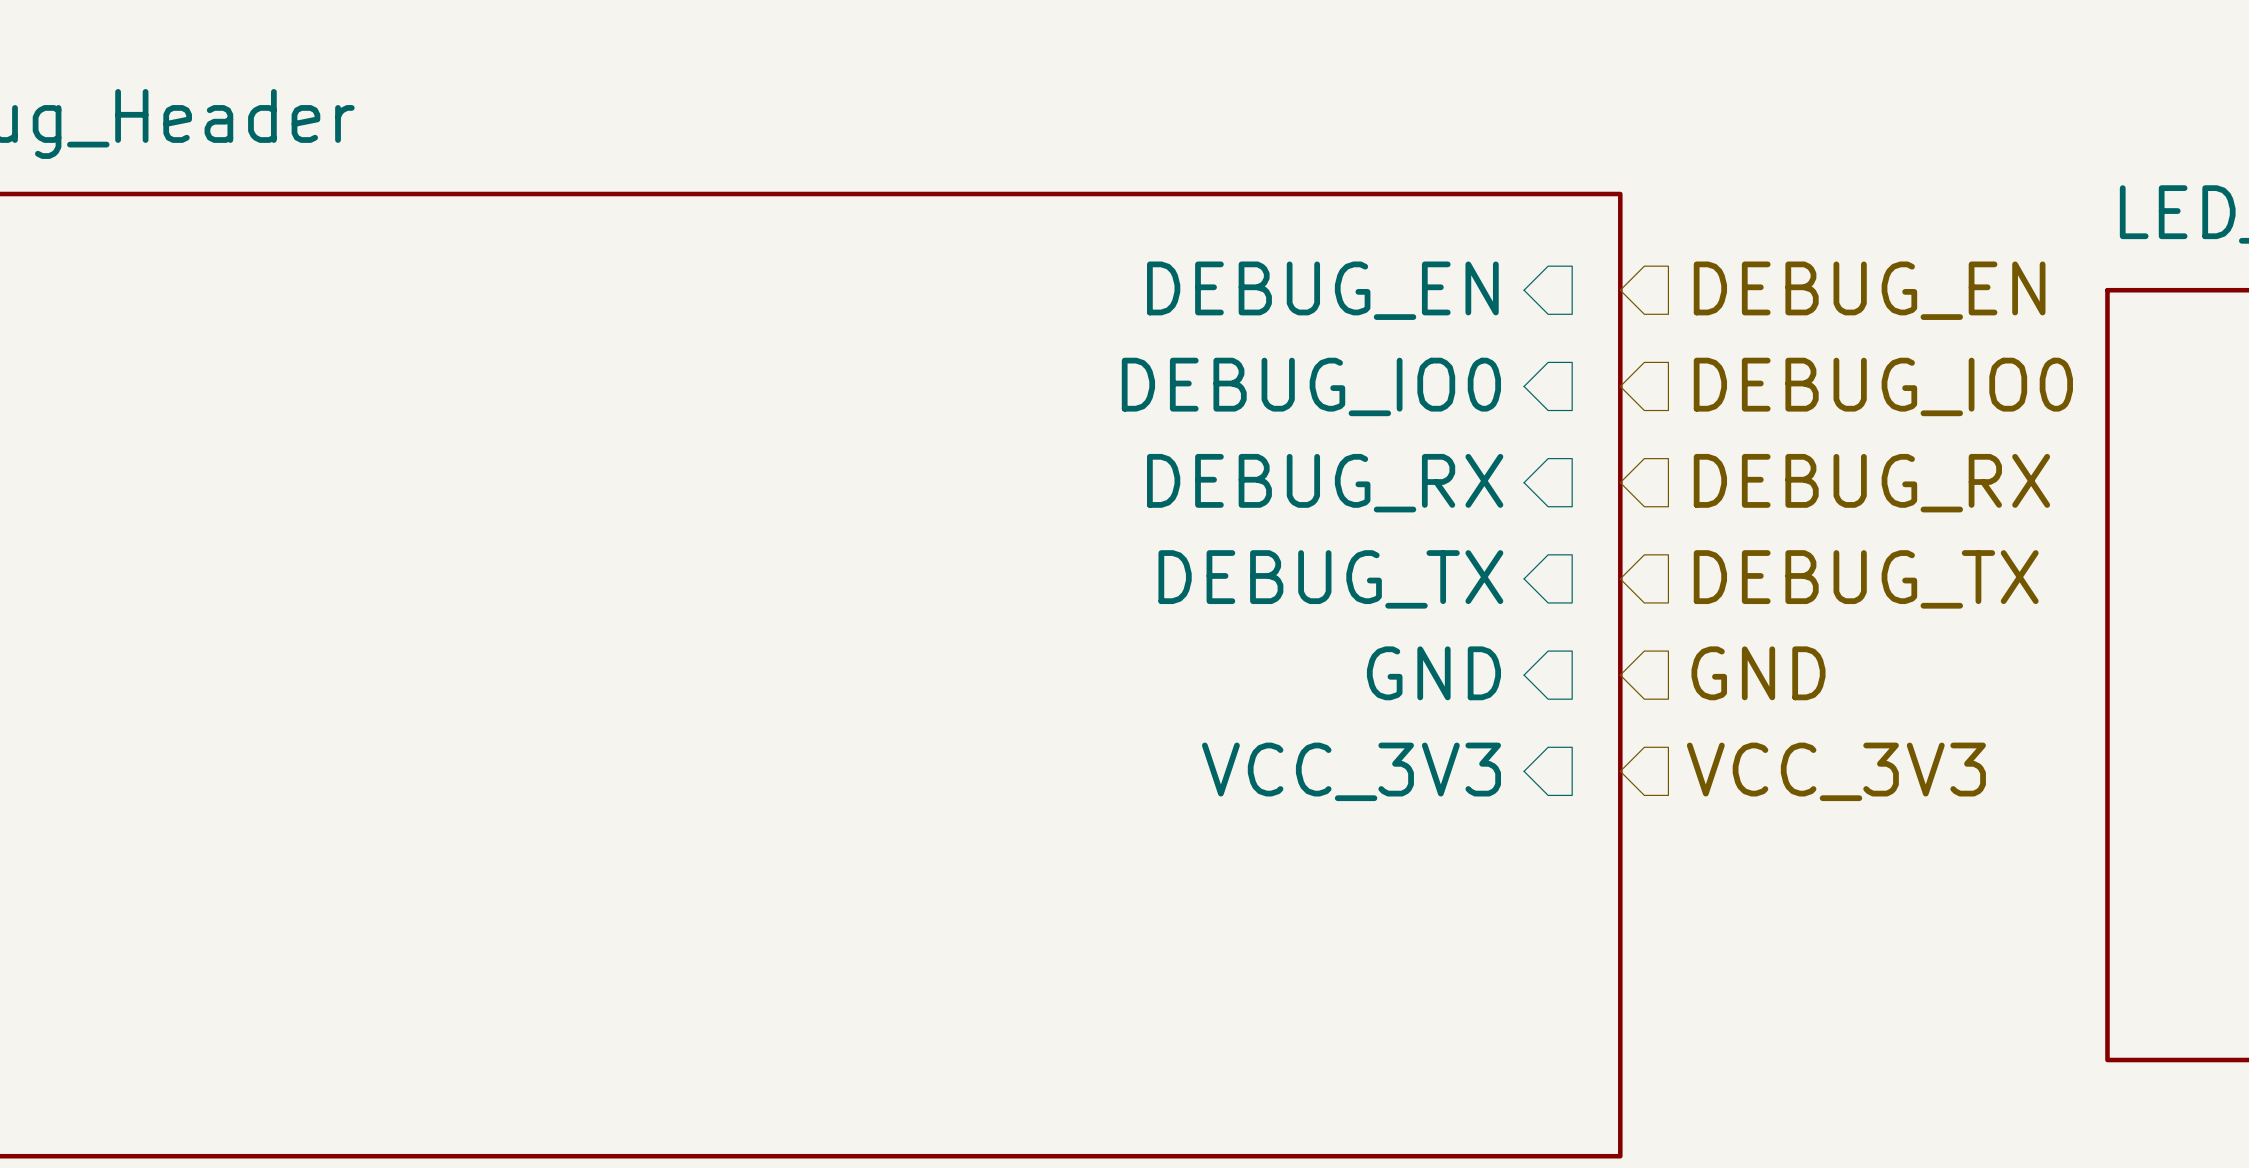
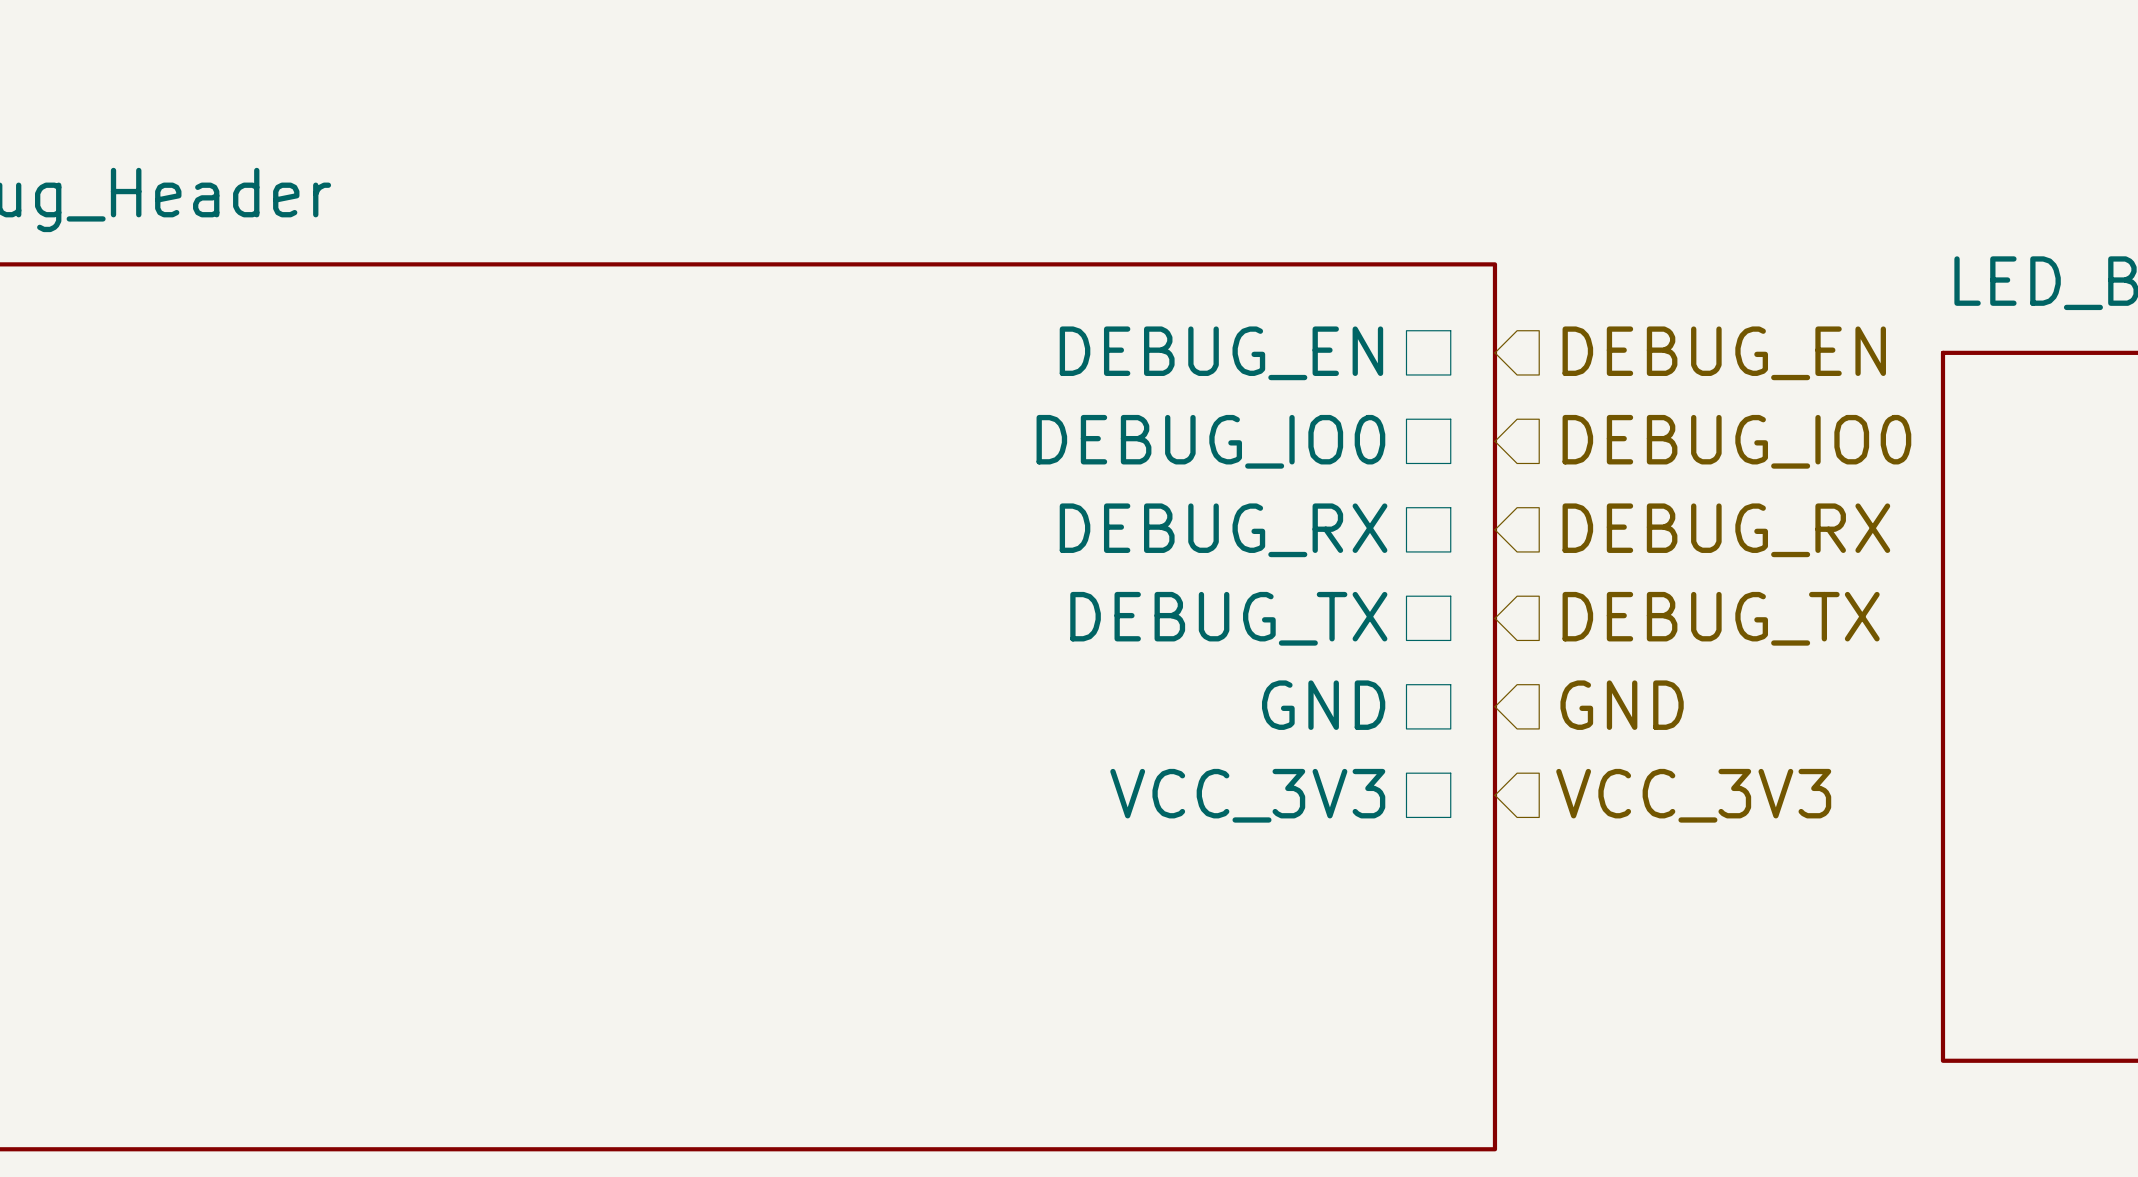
sheet pin shape: input (1322, 290) -> passive (1221, 353)
sheet pin shape: input (1311, 386) -> passive (1210, 441)
sheet pin shape: input (1325, 483) -> passive (1223, 530)
sheet pin shape: input (1330, 579) -> passive (1228, 618)
sheet pin shape: input (1433, 673) -> passive (1323, 705)
sheet pin shape: input (1351, 771) -> passive (1247, 795)

